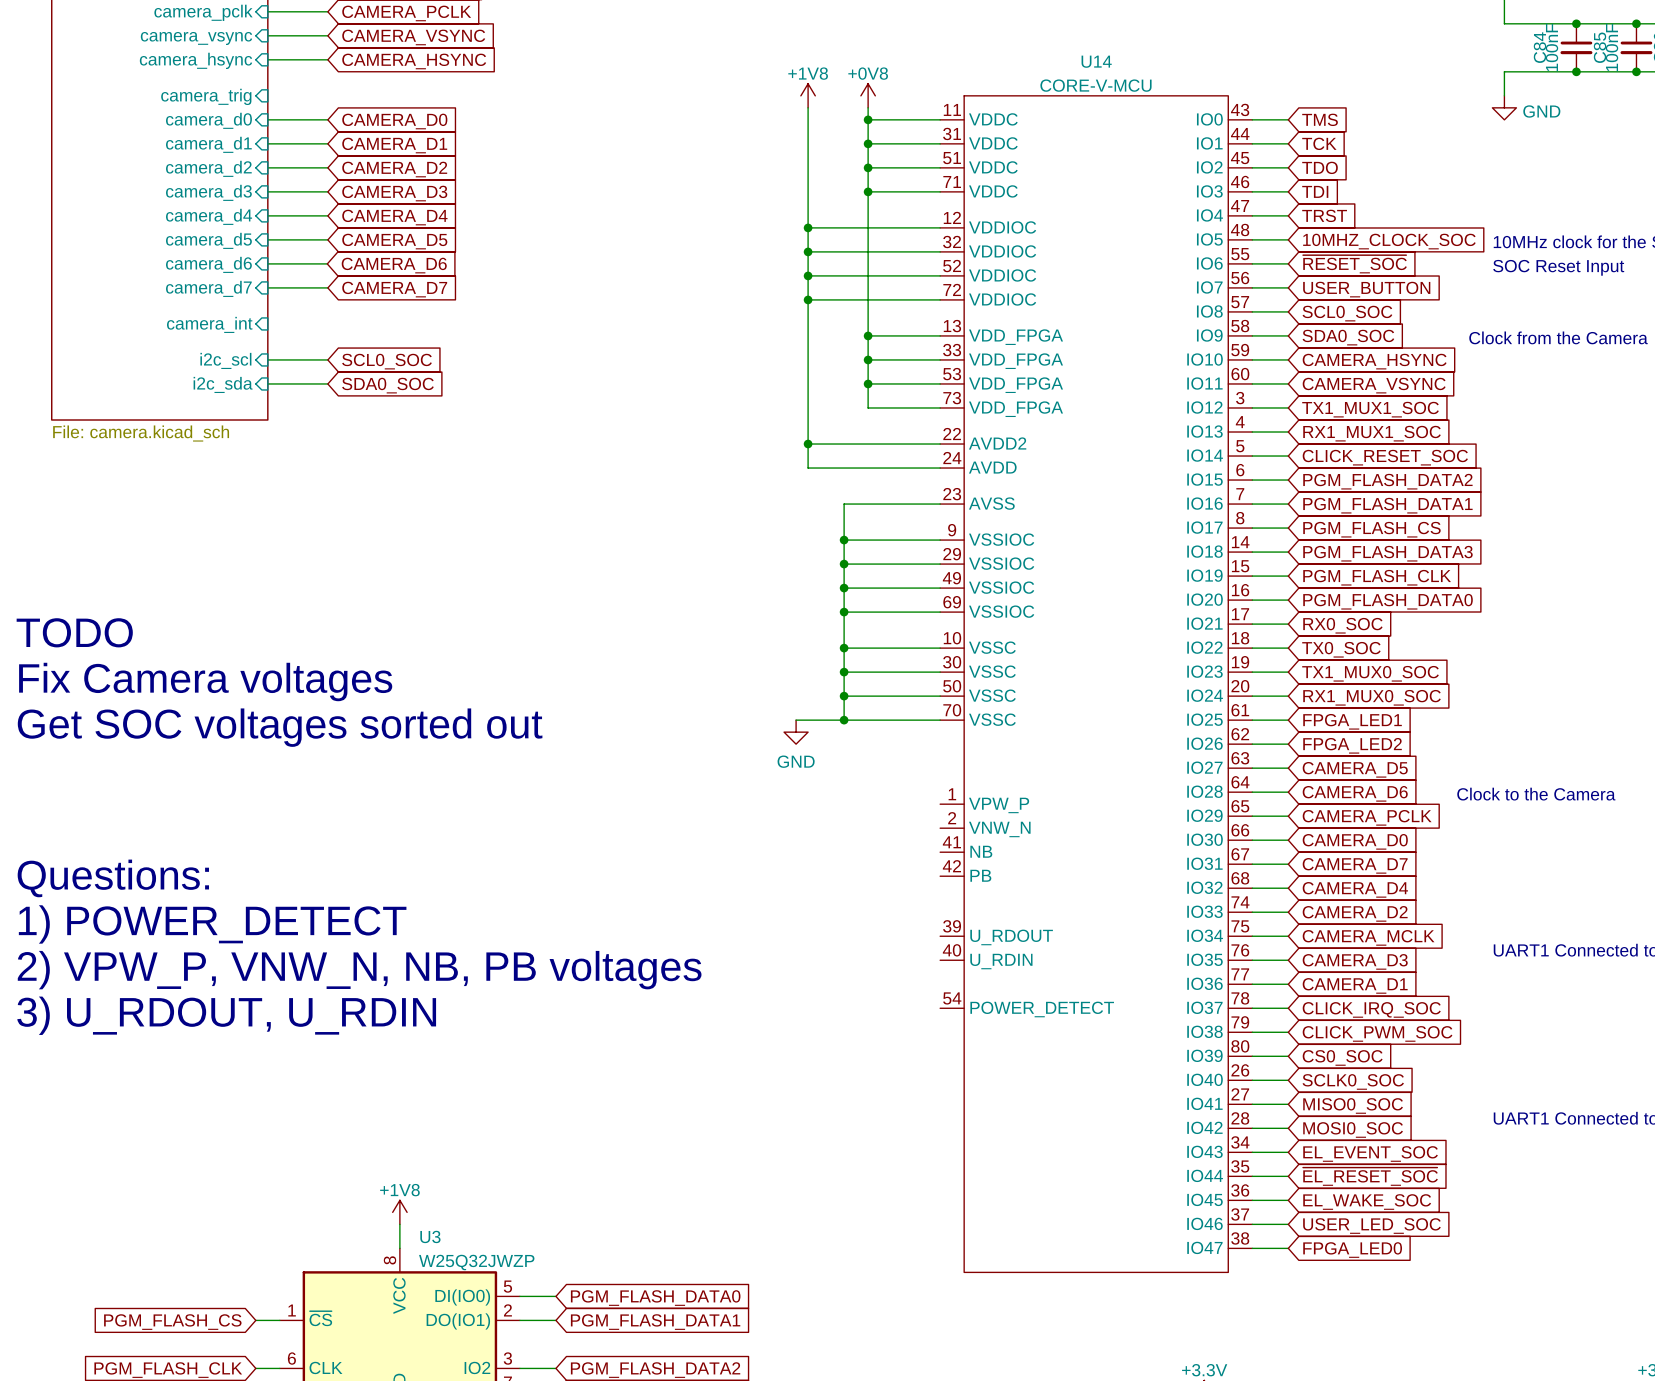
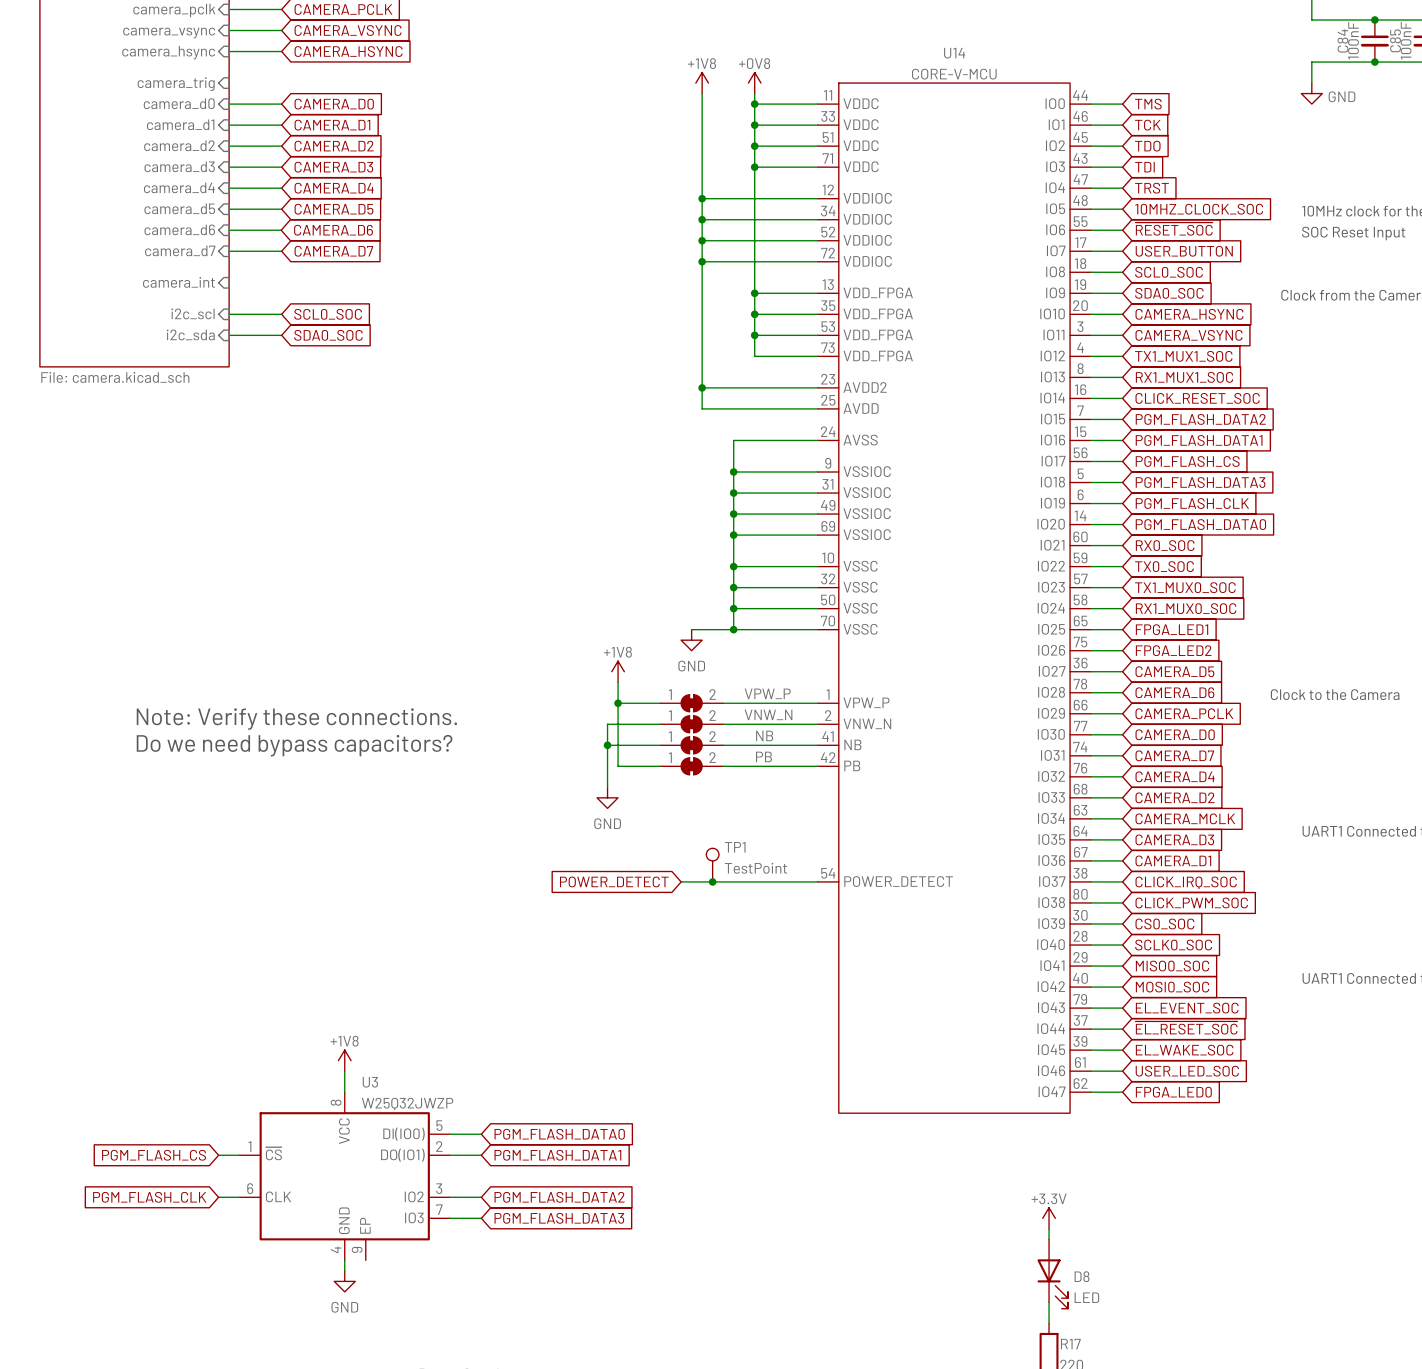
U14 symbol: [940, 95, 1253, 1273] -> [817, 83, 1092, 1114]
text: TODO (74, 632) -> none
text: Fix Camera voltages (205, 681) -> none
text: Get SOC voltages sorted out (280, 727) -> none
power symbol: none -> +1V8 (618, 671)
wire: none -> (618, 682) (618, 766) (660, 766)
label: none -> VPW_P (767, 693)
wire: none -> (618, 703) (660, 703)
junction: none -> (618, 703)
part: none -> (691, 703)
wire: none -> (723, 703) (817, 703)
label: none -> VNW_N (768, 714)
text: none -> Note: Verify these connections. (296, 719)
wire: none -> (660, 724) (607, 724) (607, 787)
part: none -> (691, 724)
wire: none -> (723, 724) (817, 724)
label: none -> NB (764, 735)
text: none -> Do we need bypass capacitors? (294, 745)
wire: none -> (607, 745) (660, 745)
junction: none -> (607, 745)
part: none -> (691, 745)
wire: none -> (723, 745) (817, 745)
label: none -> PB (763, 756)
part: none -> (691, 766)
wire: none -> (723, 766) (817, 766)
text: Questions: (113, 878) -> none
power symbol: none -> GND (607, 797)
text: 1) POWER_DETECT (212, 924) -> none
text: 2) VPW_P, VNW_N, NB, PB voltages (359, 970) -> none
TP1: none -> TestPoint (712, 865)
wire: none -> (681, 881) (817, 881)
junction: none -> (712, 881)
global label: none -> POWER_DETECT (614, 881)
text: 3) U_RDOUT, U_RDIN (226, 1015) -> none

